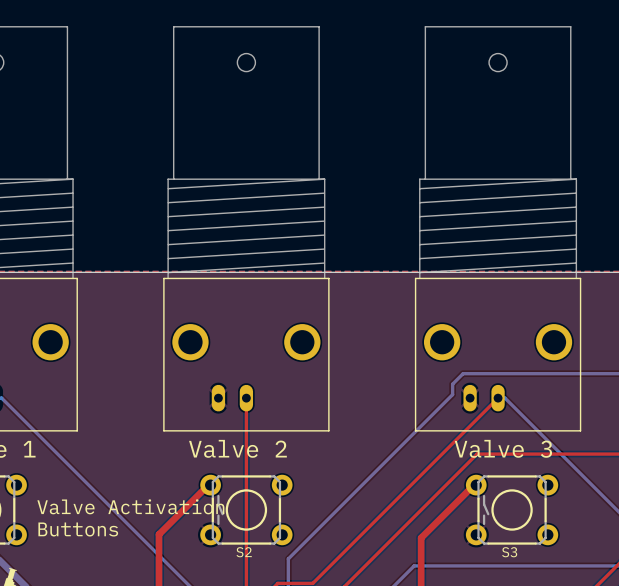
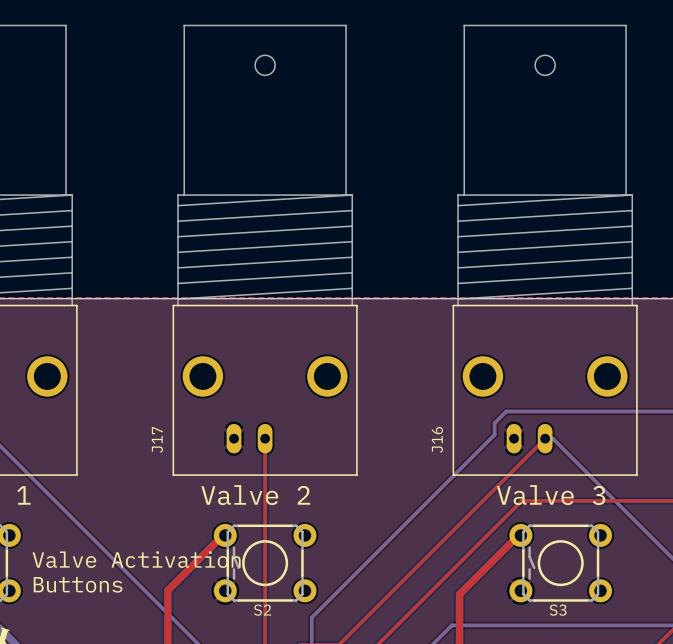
J17 name: none -> J17 (157, 439)
J16 name: none -> J16 (437, 439)

